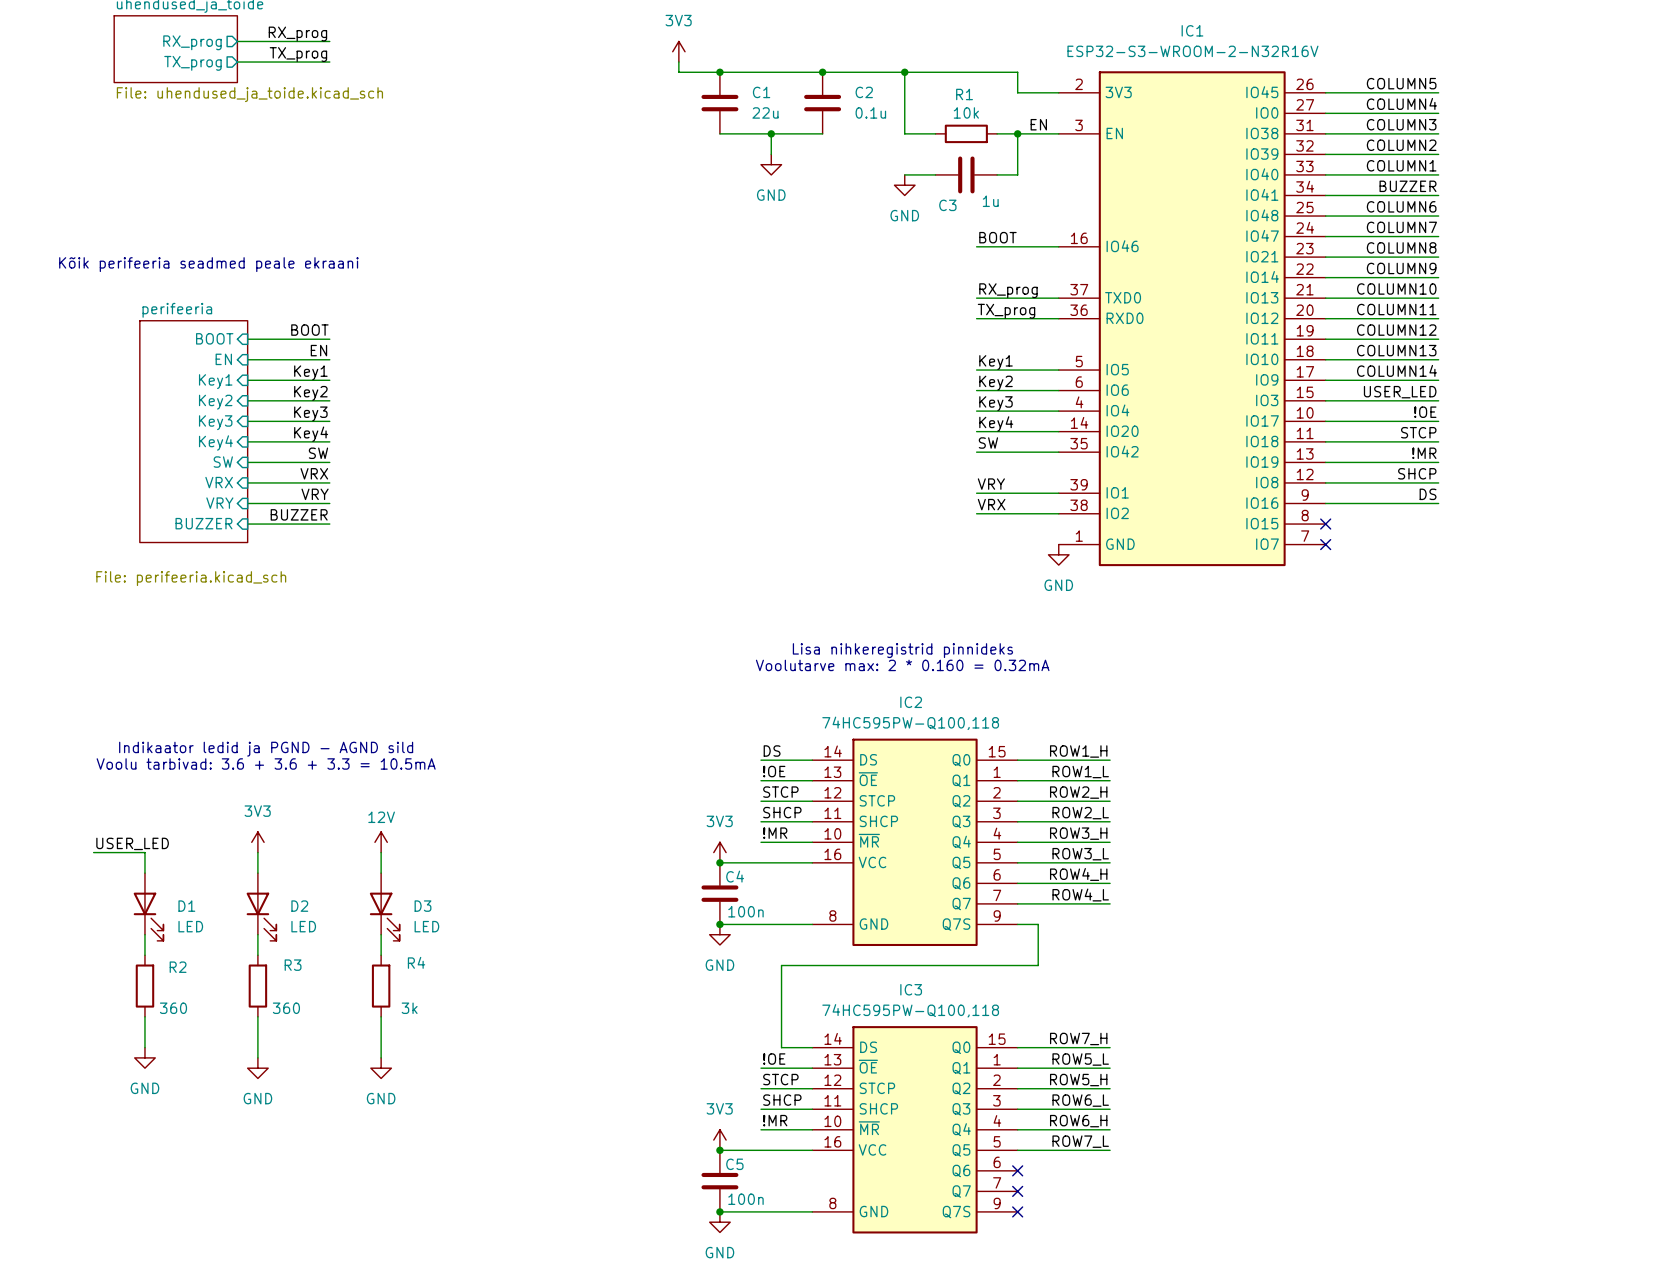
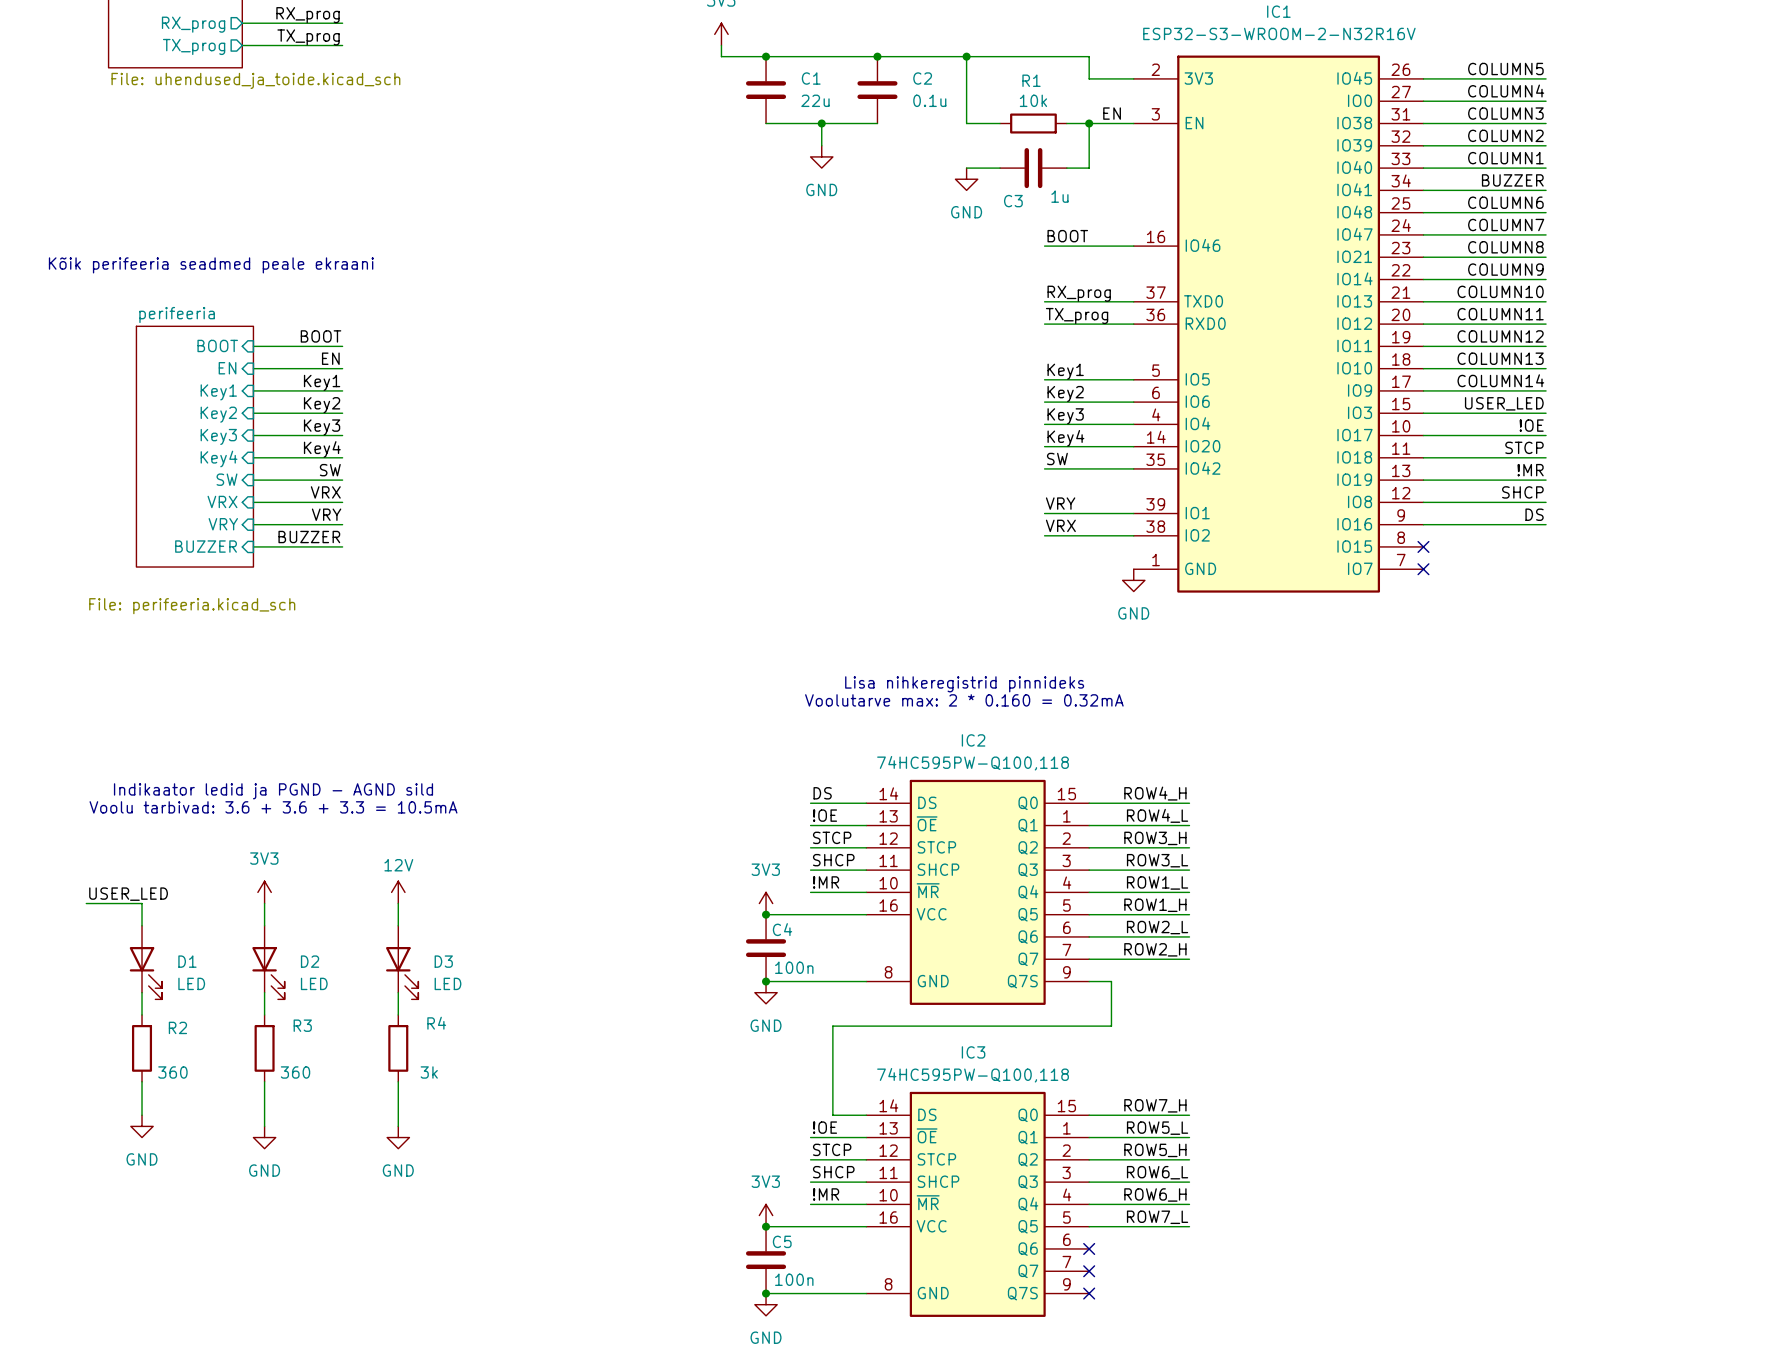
label: ROW1_H (1078, 751) -> ROW4_H (1155, 793)
label: ROW1_L (1080, 772) -> ROW4_L (1157, 815)
label: ROW2_H (1078, 792) -> ROW3_H (1155, 838)
label: ROW2_L (1080, 813) -> ROW3_L (1157, 860)
label: ROW3_H (1078, 833) -> ROW1_L (1157, 882)
label: ROW3_L (1080, 854) -> ROW1_H (1155, 905)
label: ROW4_H (1078, 874) -> ROW2_L (1157, 927)
label: ROW4_L (1080, 895) -> ROW2_H (1155, 949)

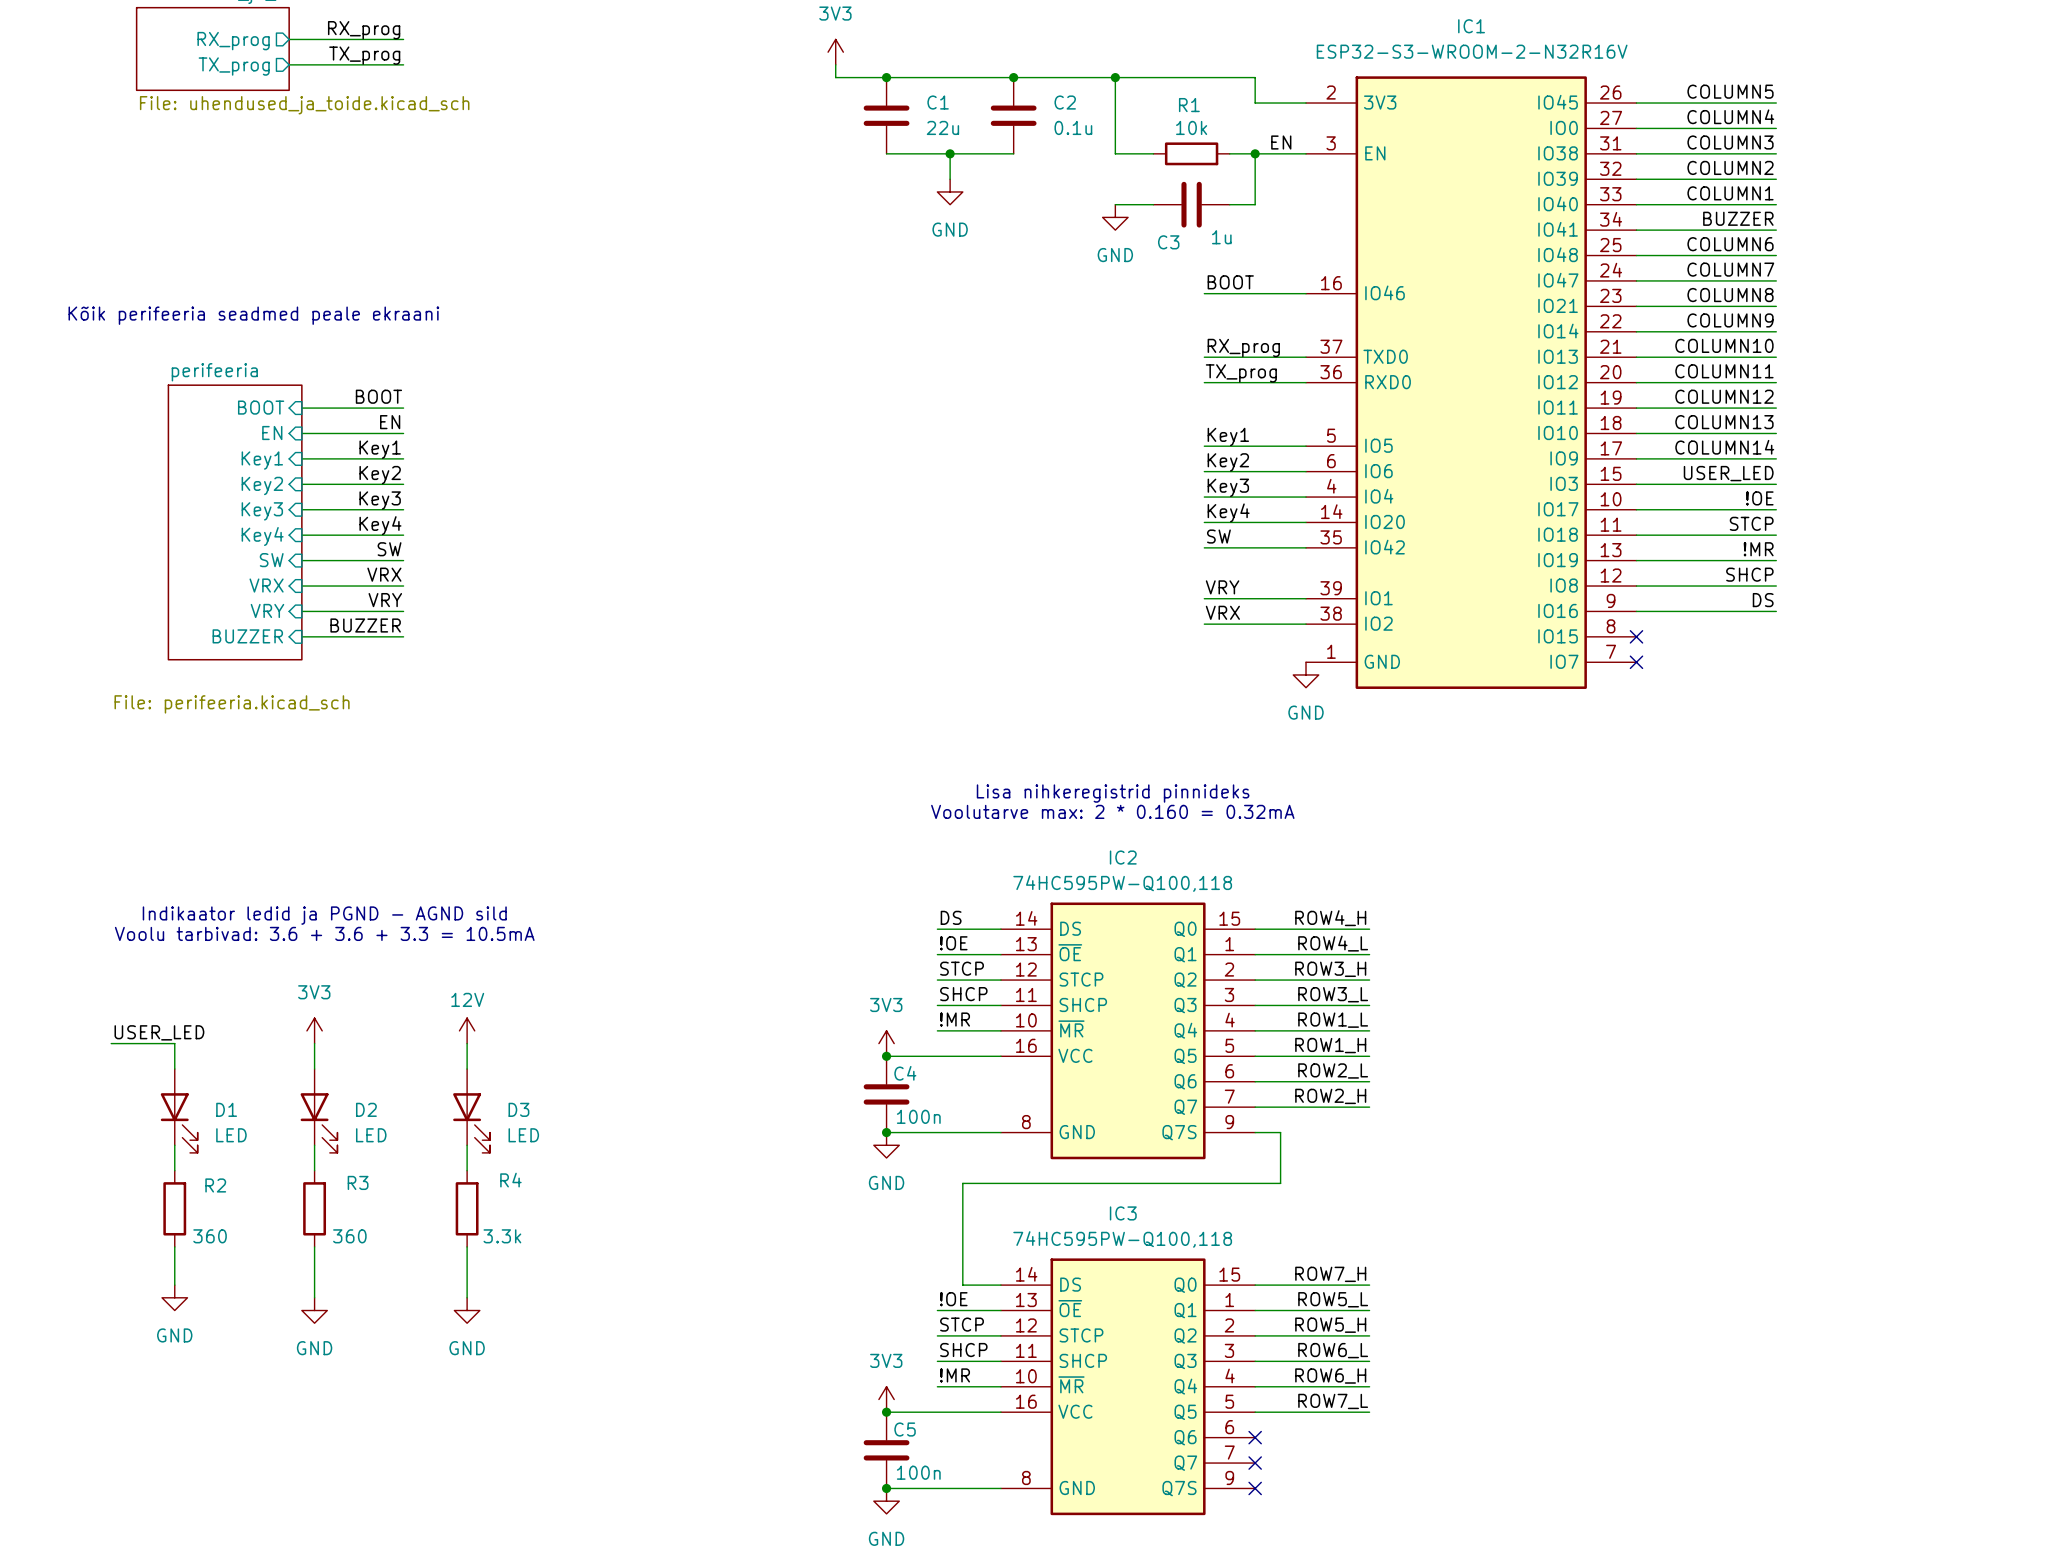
R4 value: 3k (429, 1072) -> 3.3k (502, 1236)

